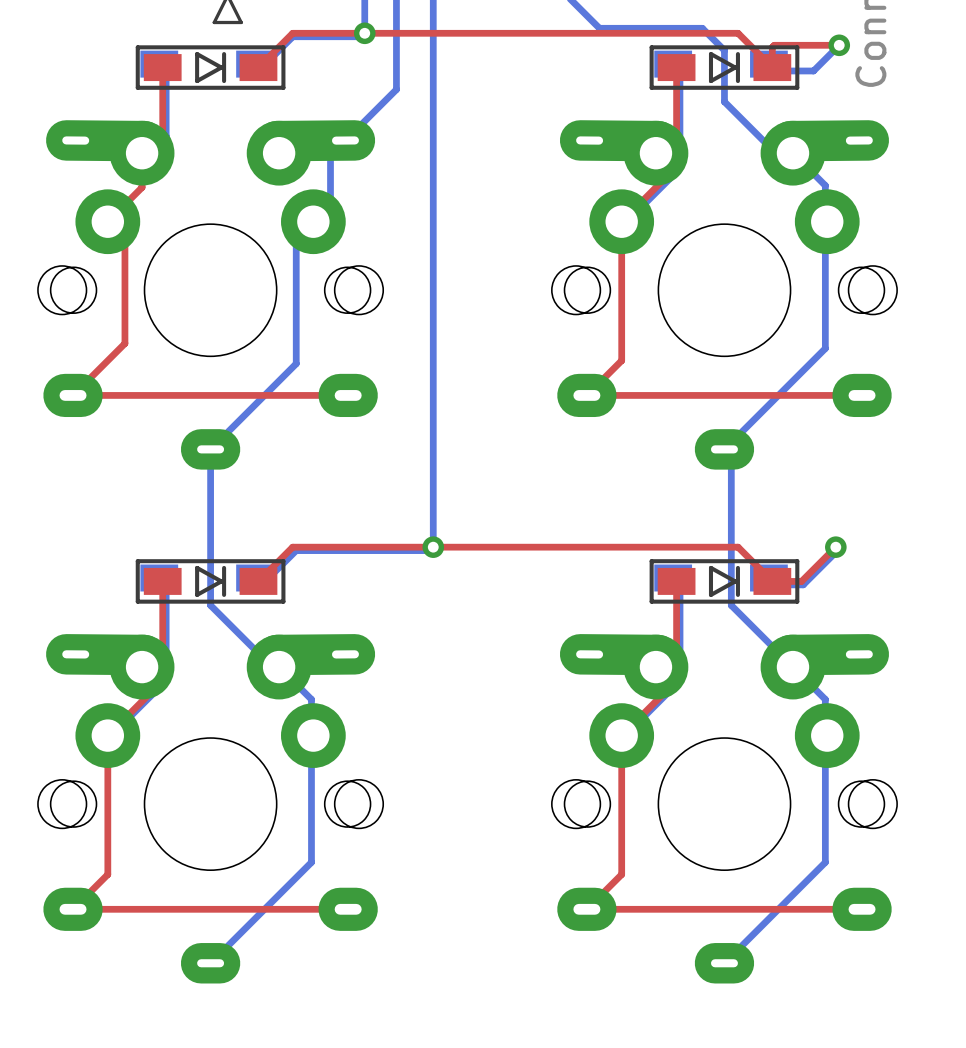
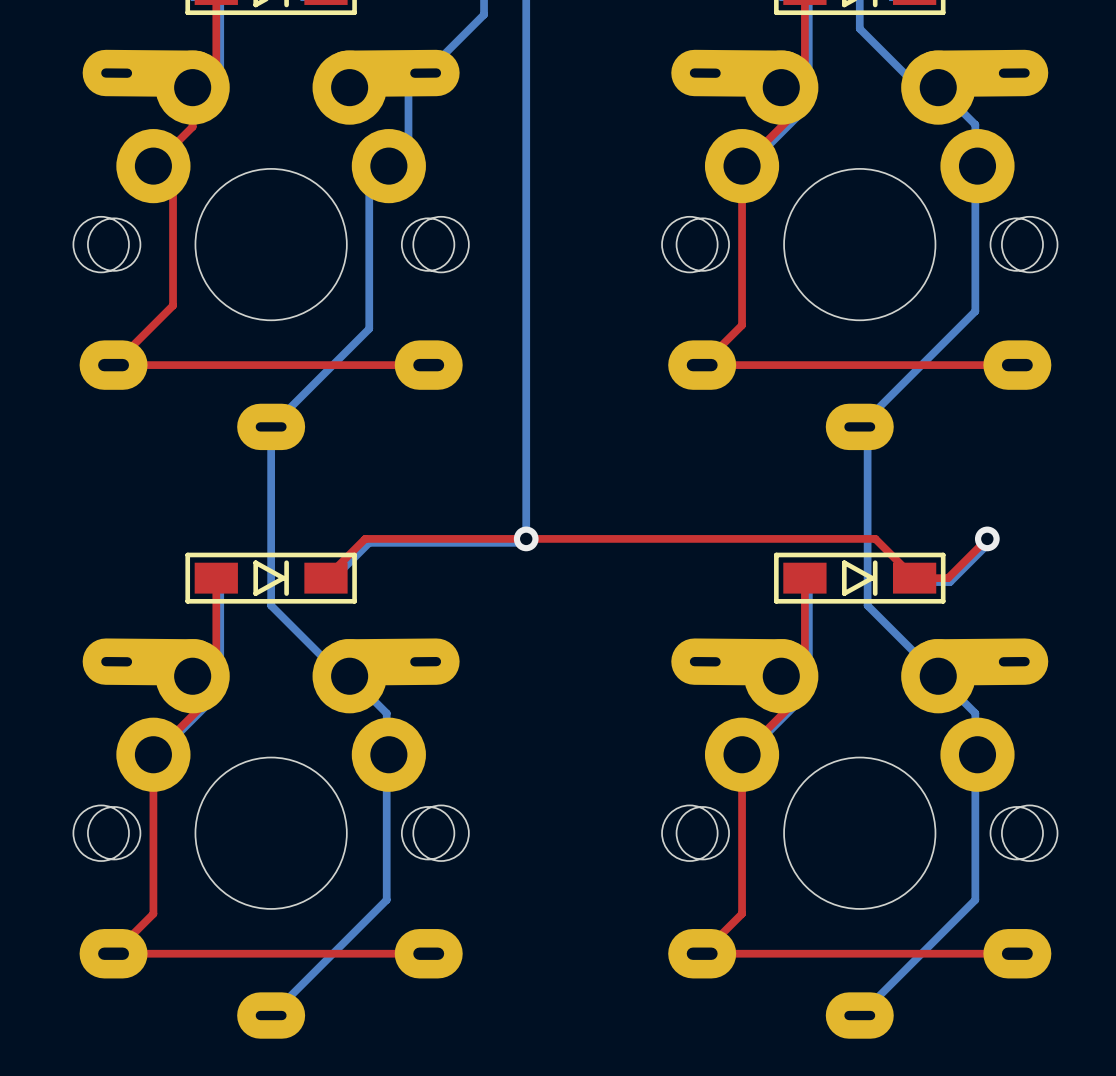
part footprint: [135, 559, 286, 604] -> [185, 552, 357, 604]
part footprint: [649, 559, 800, 604] -> [774, 552, 946, 604]

